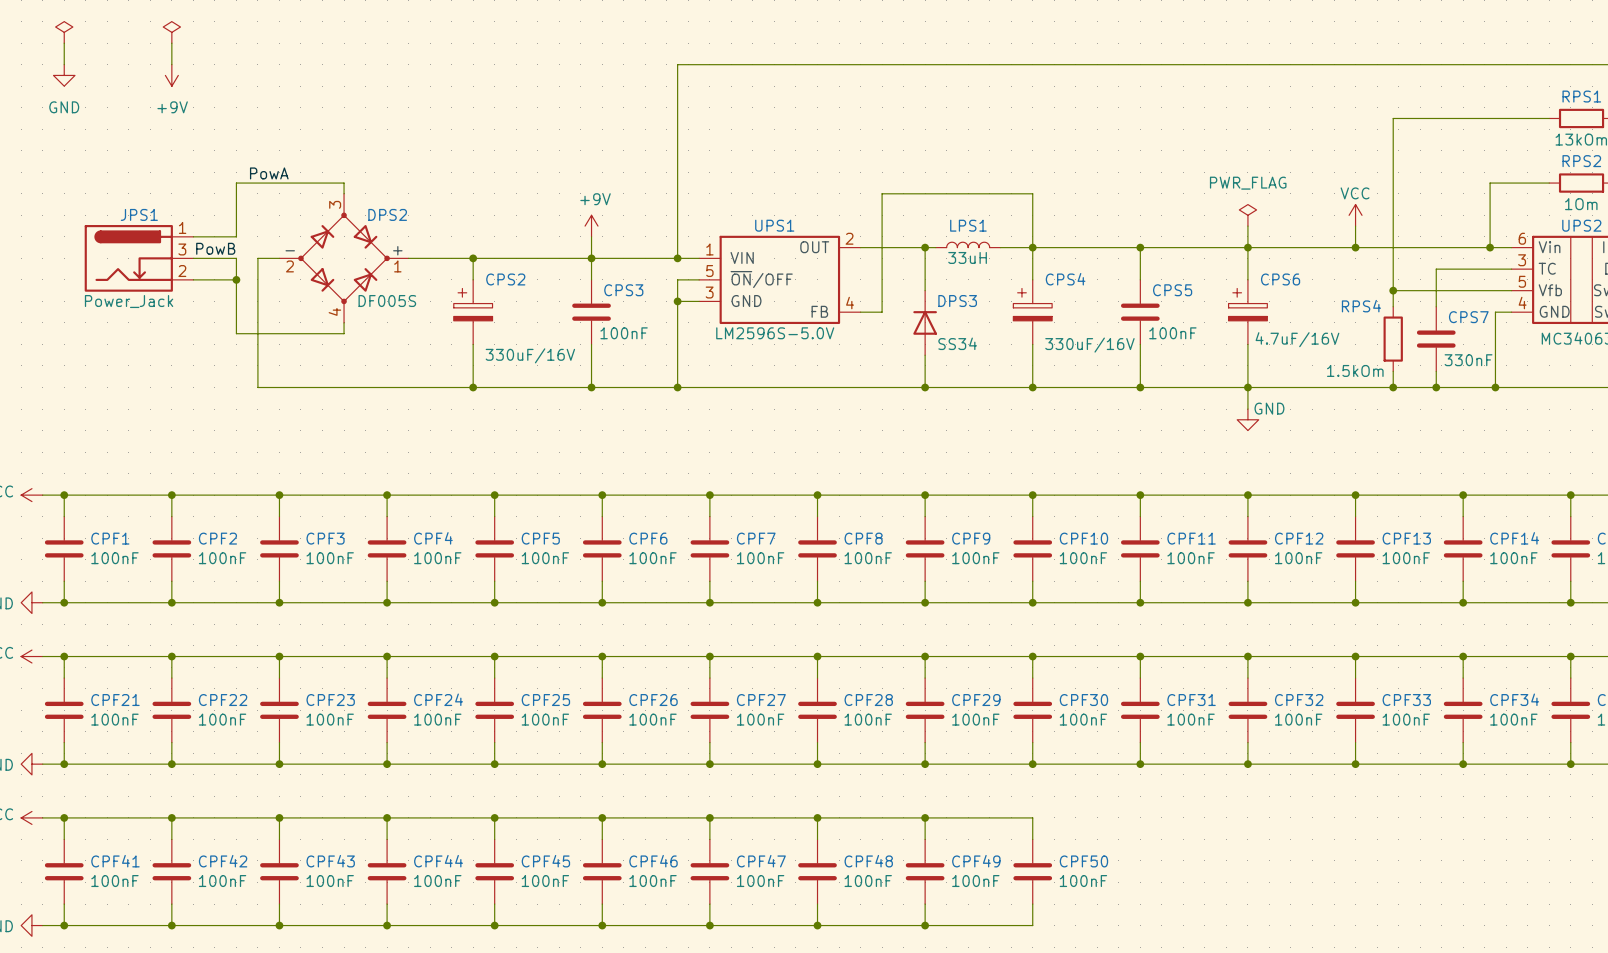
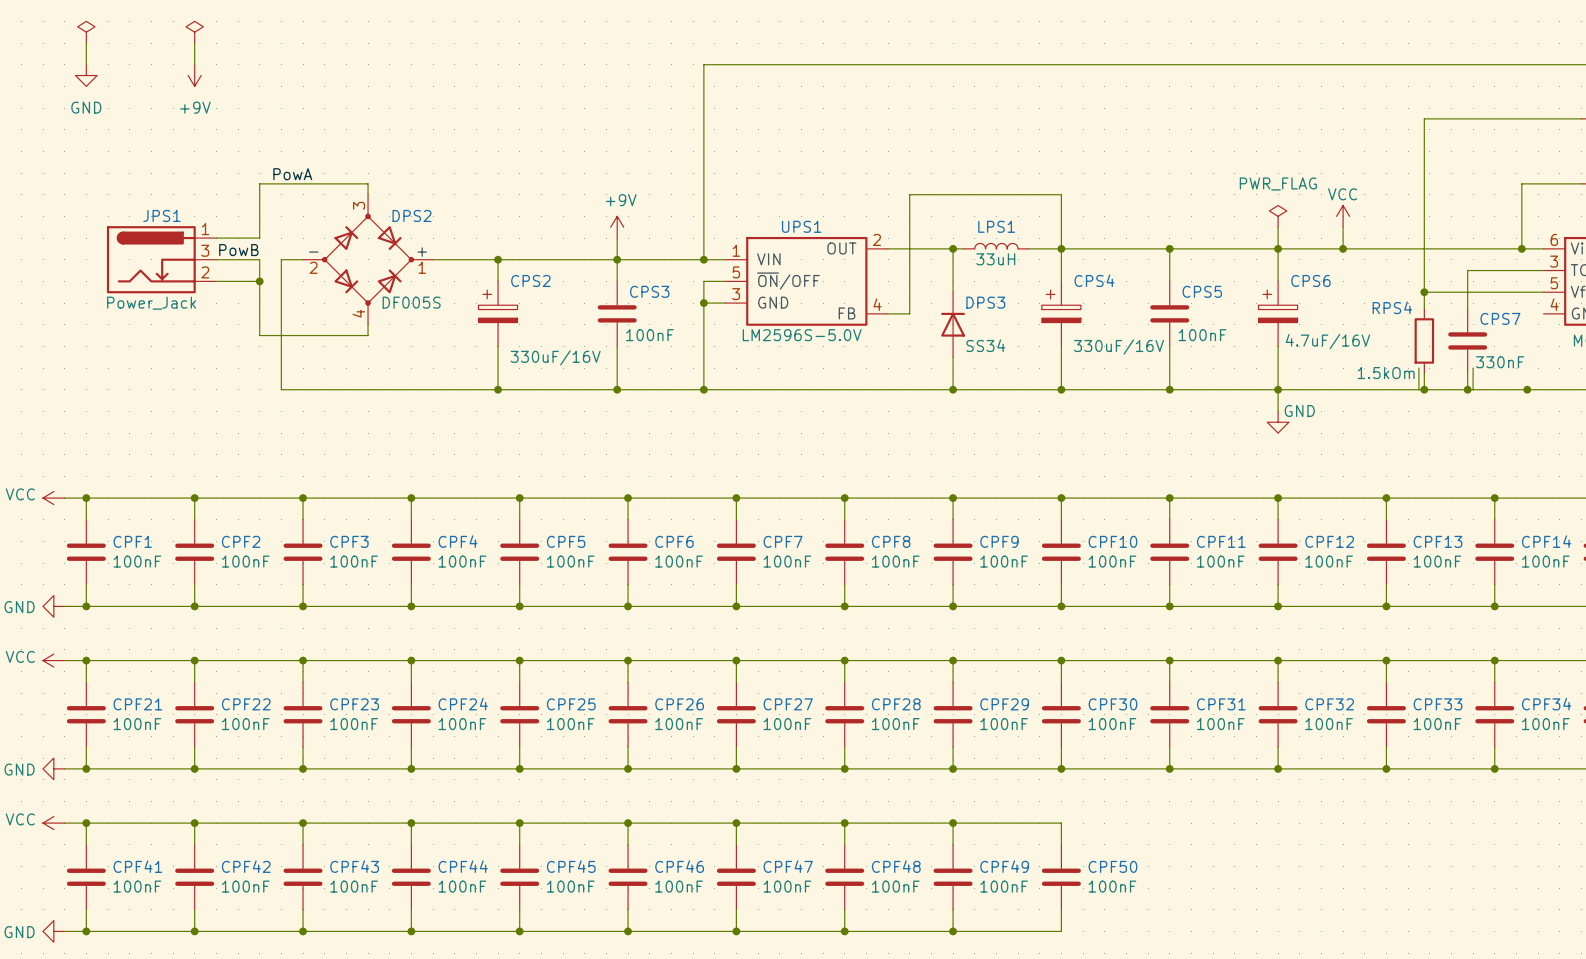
power symbol position: VCC (1355, 215) -> VCC (1343, 216)
wire: (1355, 226) (1355, 247) -> (1343, 227) (1343, 248)
junction position: (1355, 247) -> (1343, 248)
wire: (1511, 312) (1495, 312) (1495, 387) -> none
wire: none -> (1418, 368) (1418, 389)
wire: none -> (1473, 368) (1473, 389)

